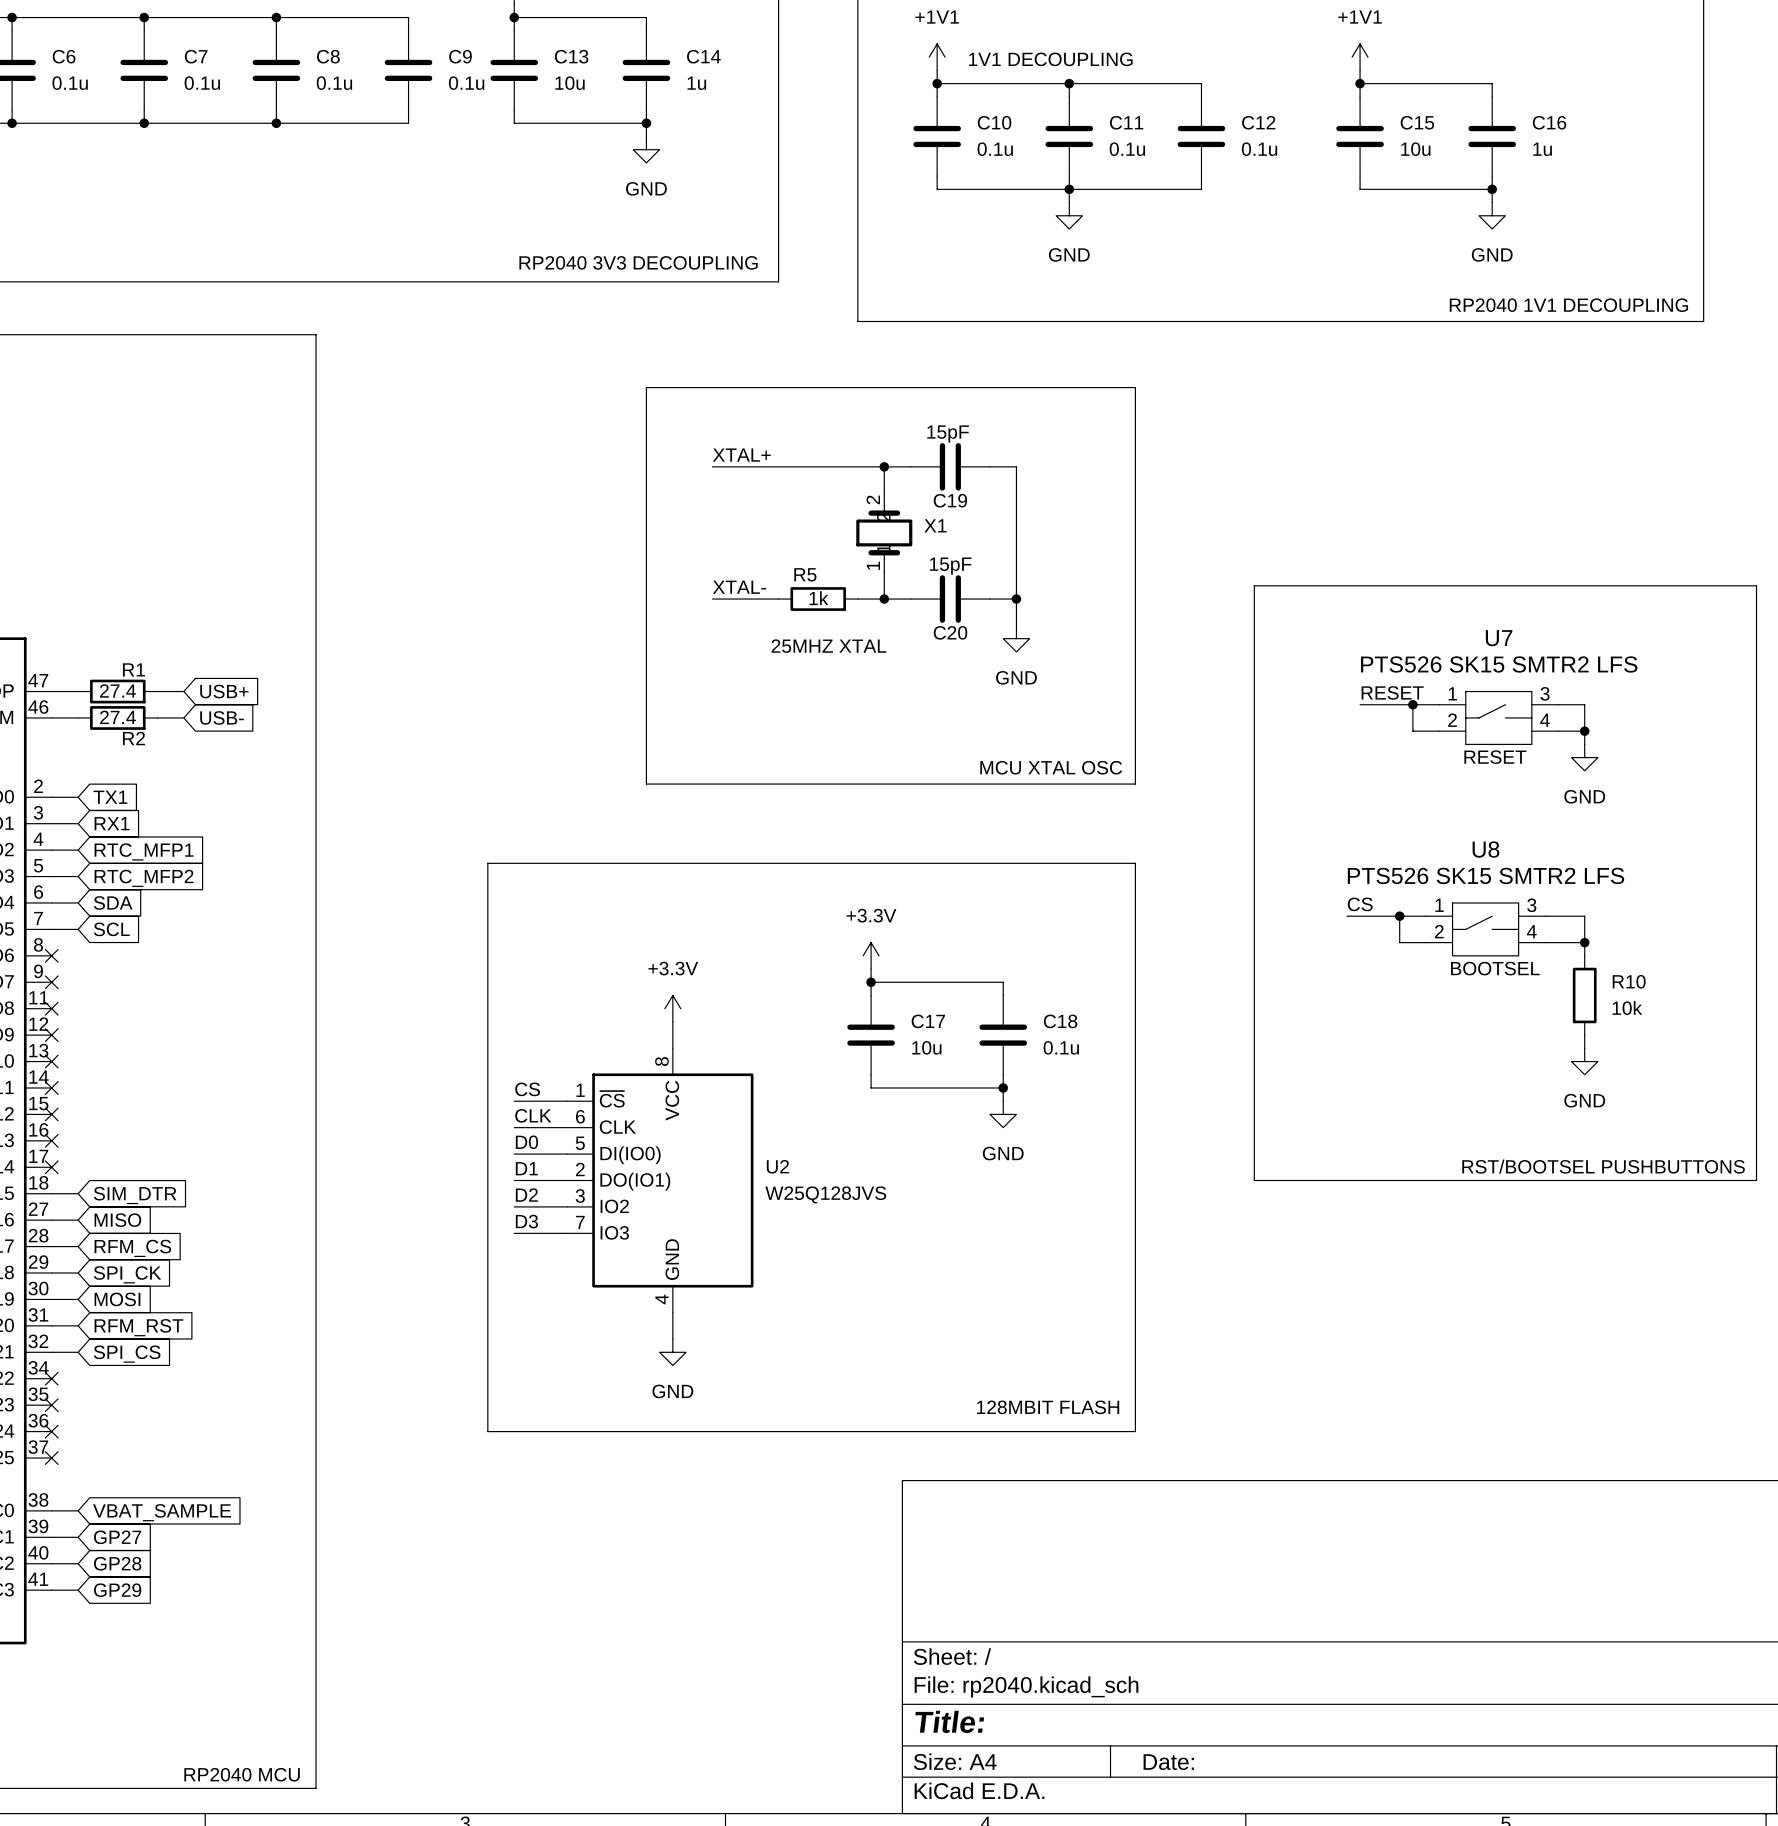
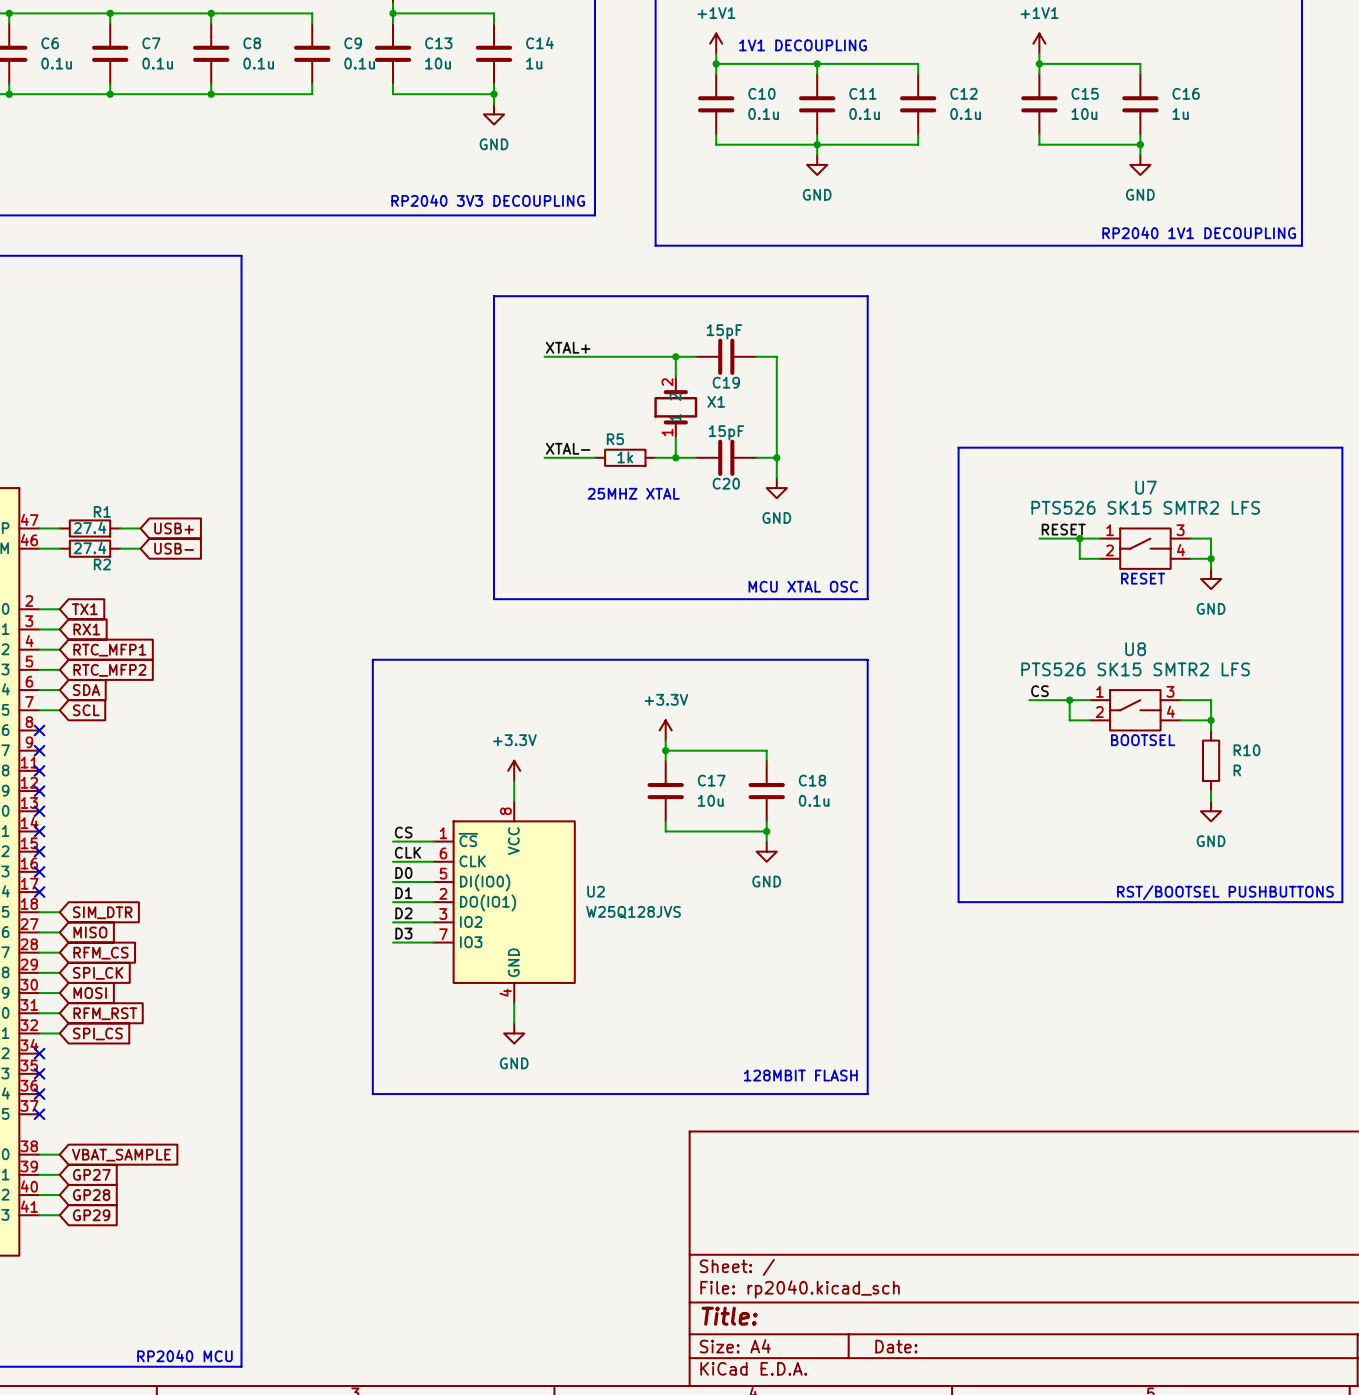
R10 value: 10k (1627, 1007) -> R (1237, 770)

